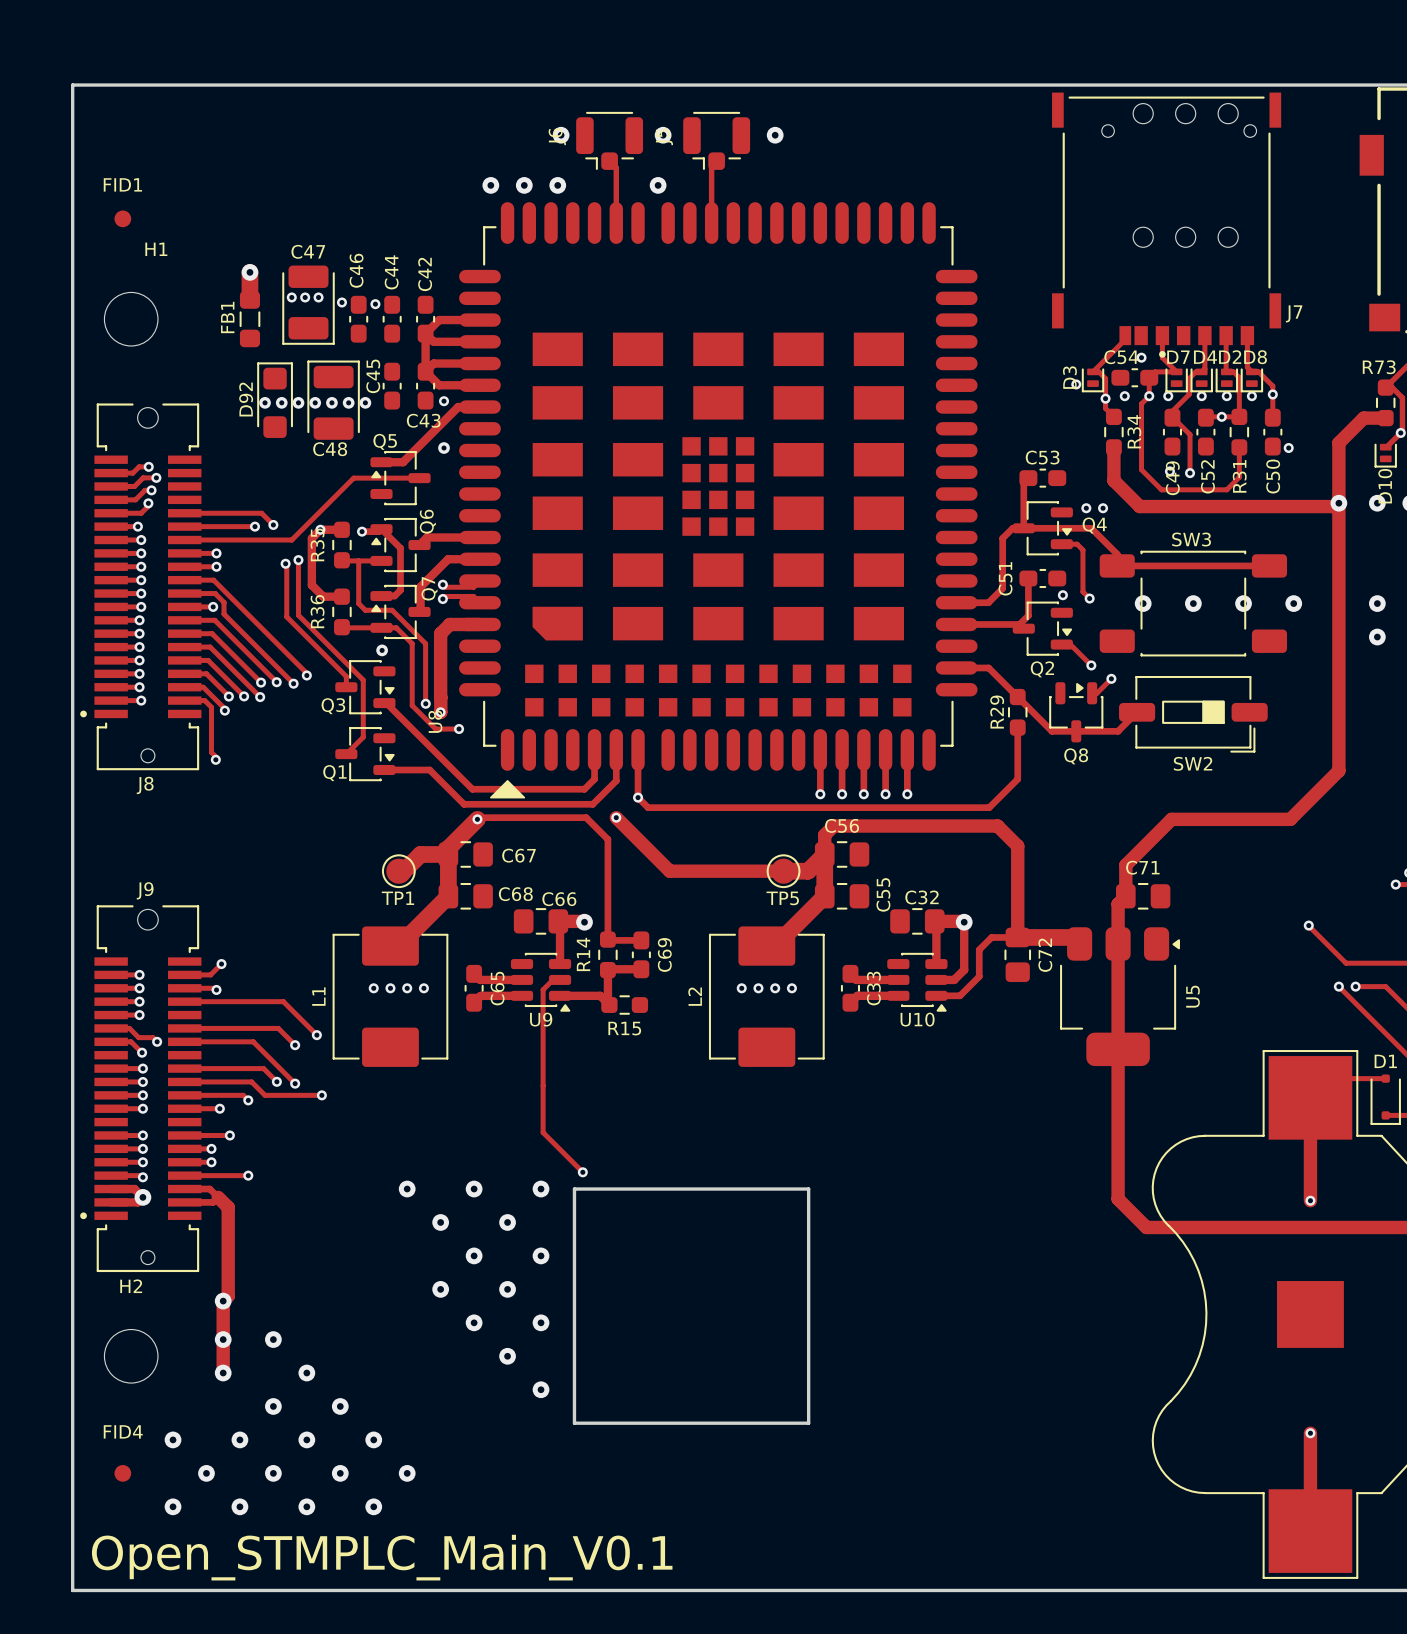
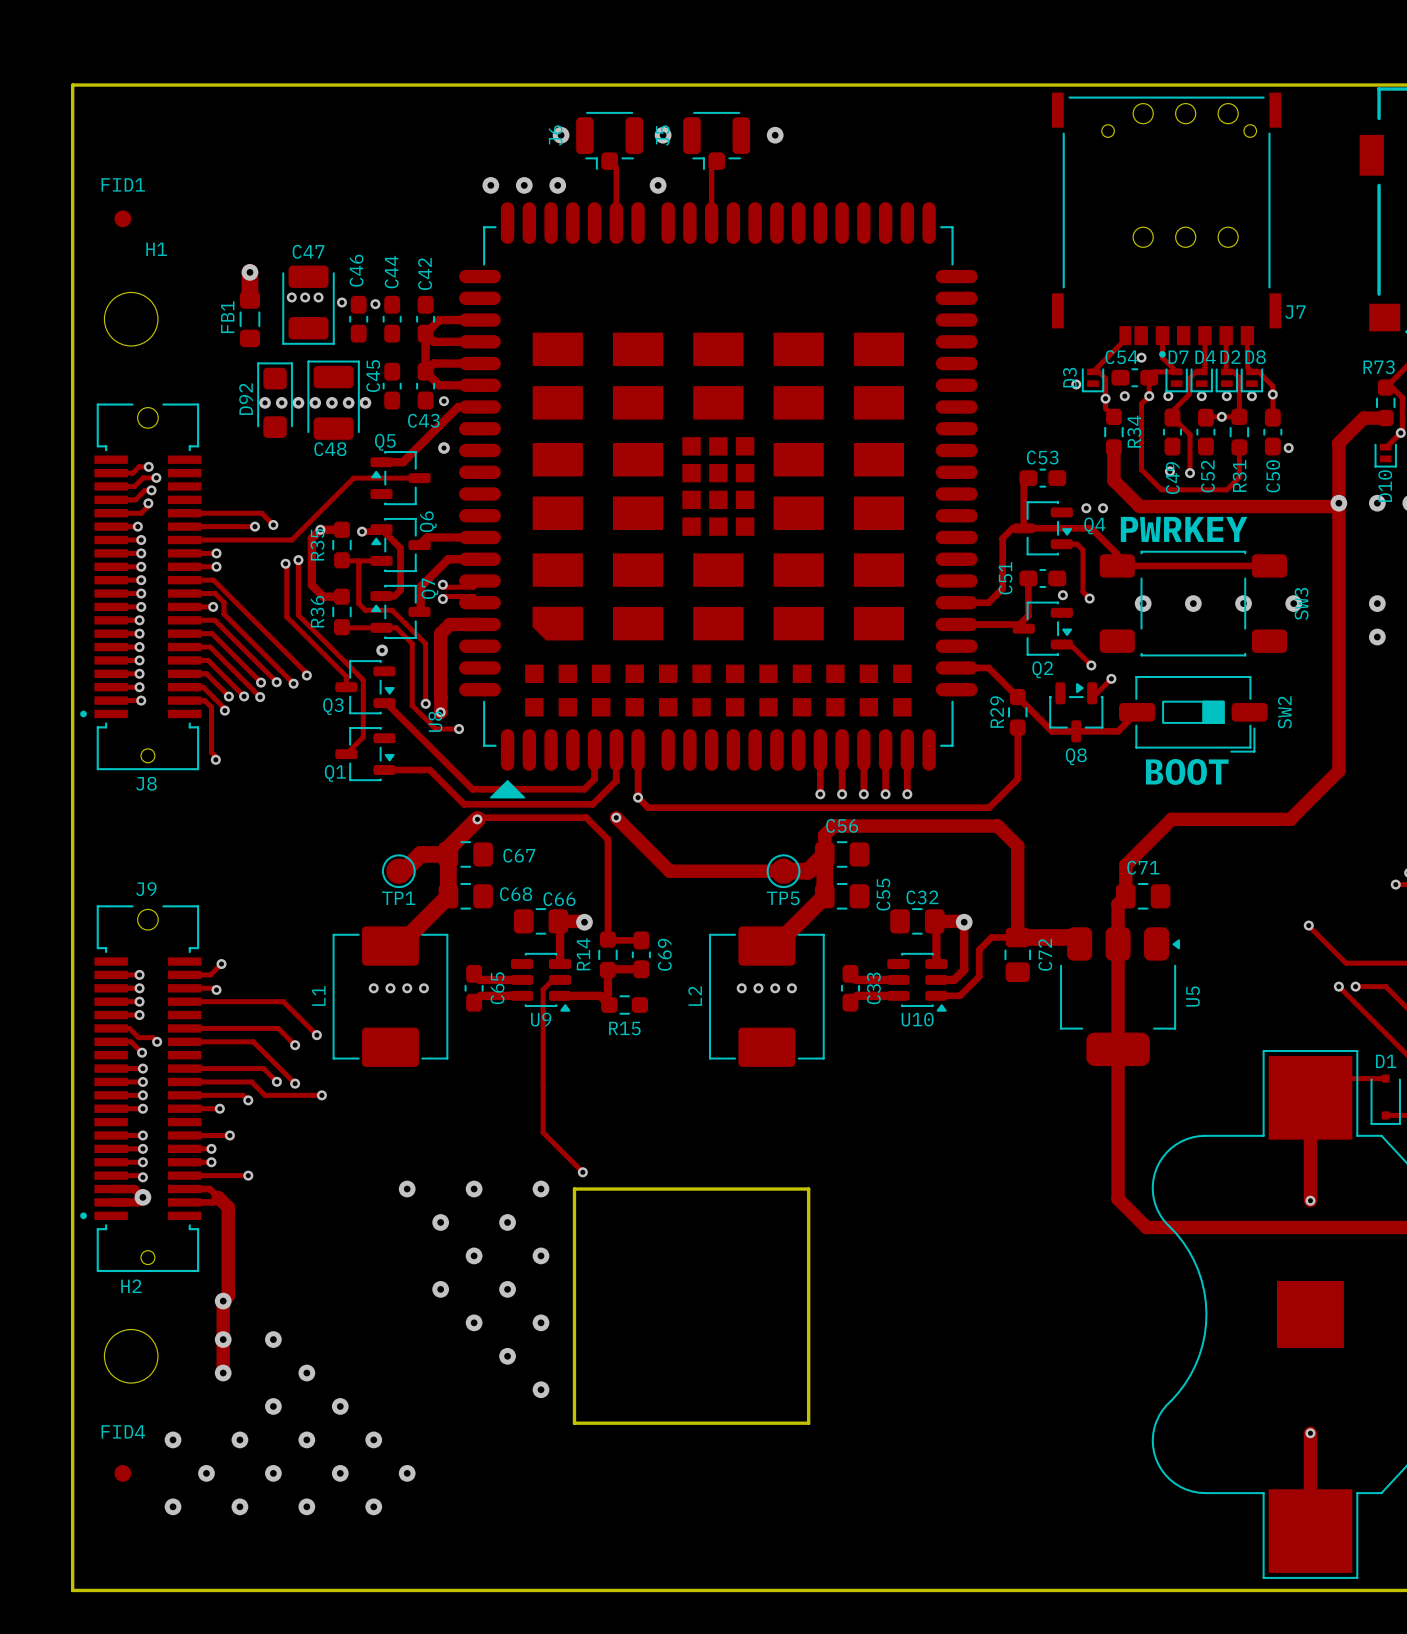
text: none -> PWRKEY (1184, 529)
SW3 name rotation: 0° (1191, 539) -> 90° counterclockwise (1301, 603)
SW3 name position: SW3 (1191, 539) -> SW3 (1301, 603)
SW2 name rotation: 0° (1193, 763) -> 90° counterclockwise (1284, 712)
SW2 name position: SW2 (1193, 763) -> SW2 (1284, 712)
text: none -> BOOT (1187, 771)
text: Open_STMPLC_Main_V0.1 (382, 1557) -> none

